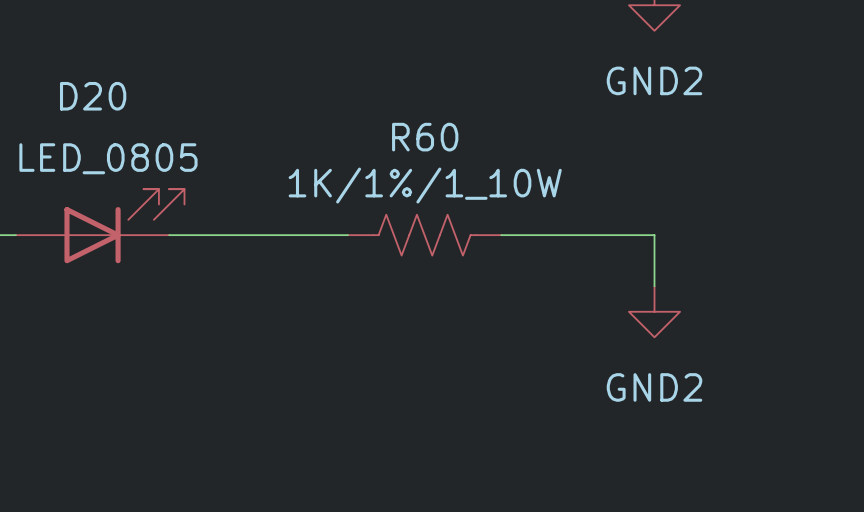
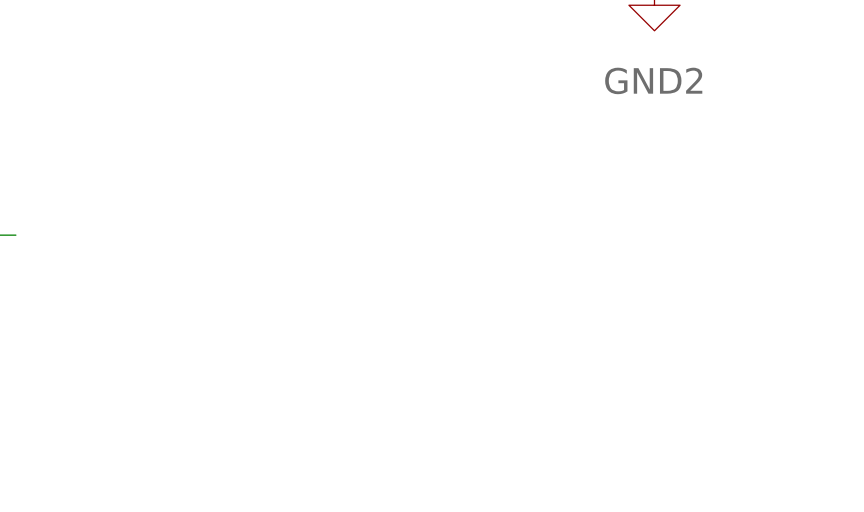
D20: LED_0805 (100, 226) -> none
wire: (169, 235) (347, 235) -> none
R60: 1K/1%/1_10W (424, 235) -> none
wire: (501, 235) (654, 235) (654, 286) -> none
power symbol: GND2 (654, 311) -> none

